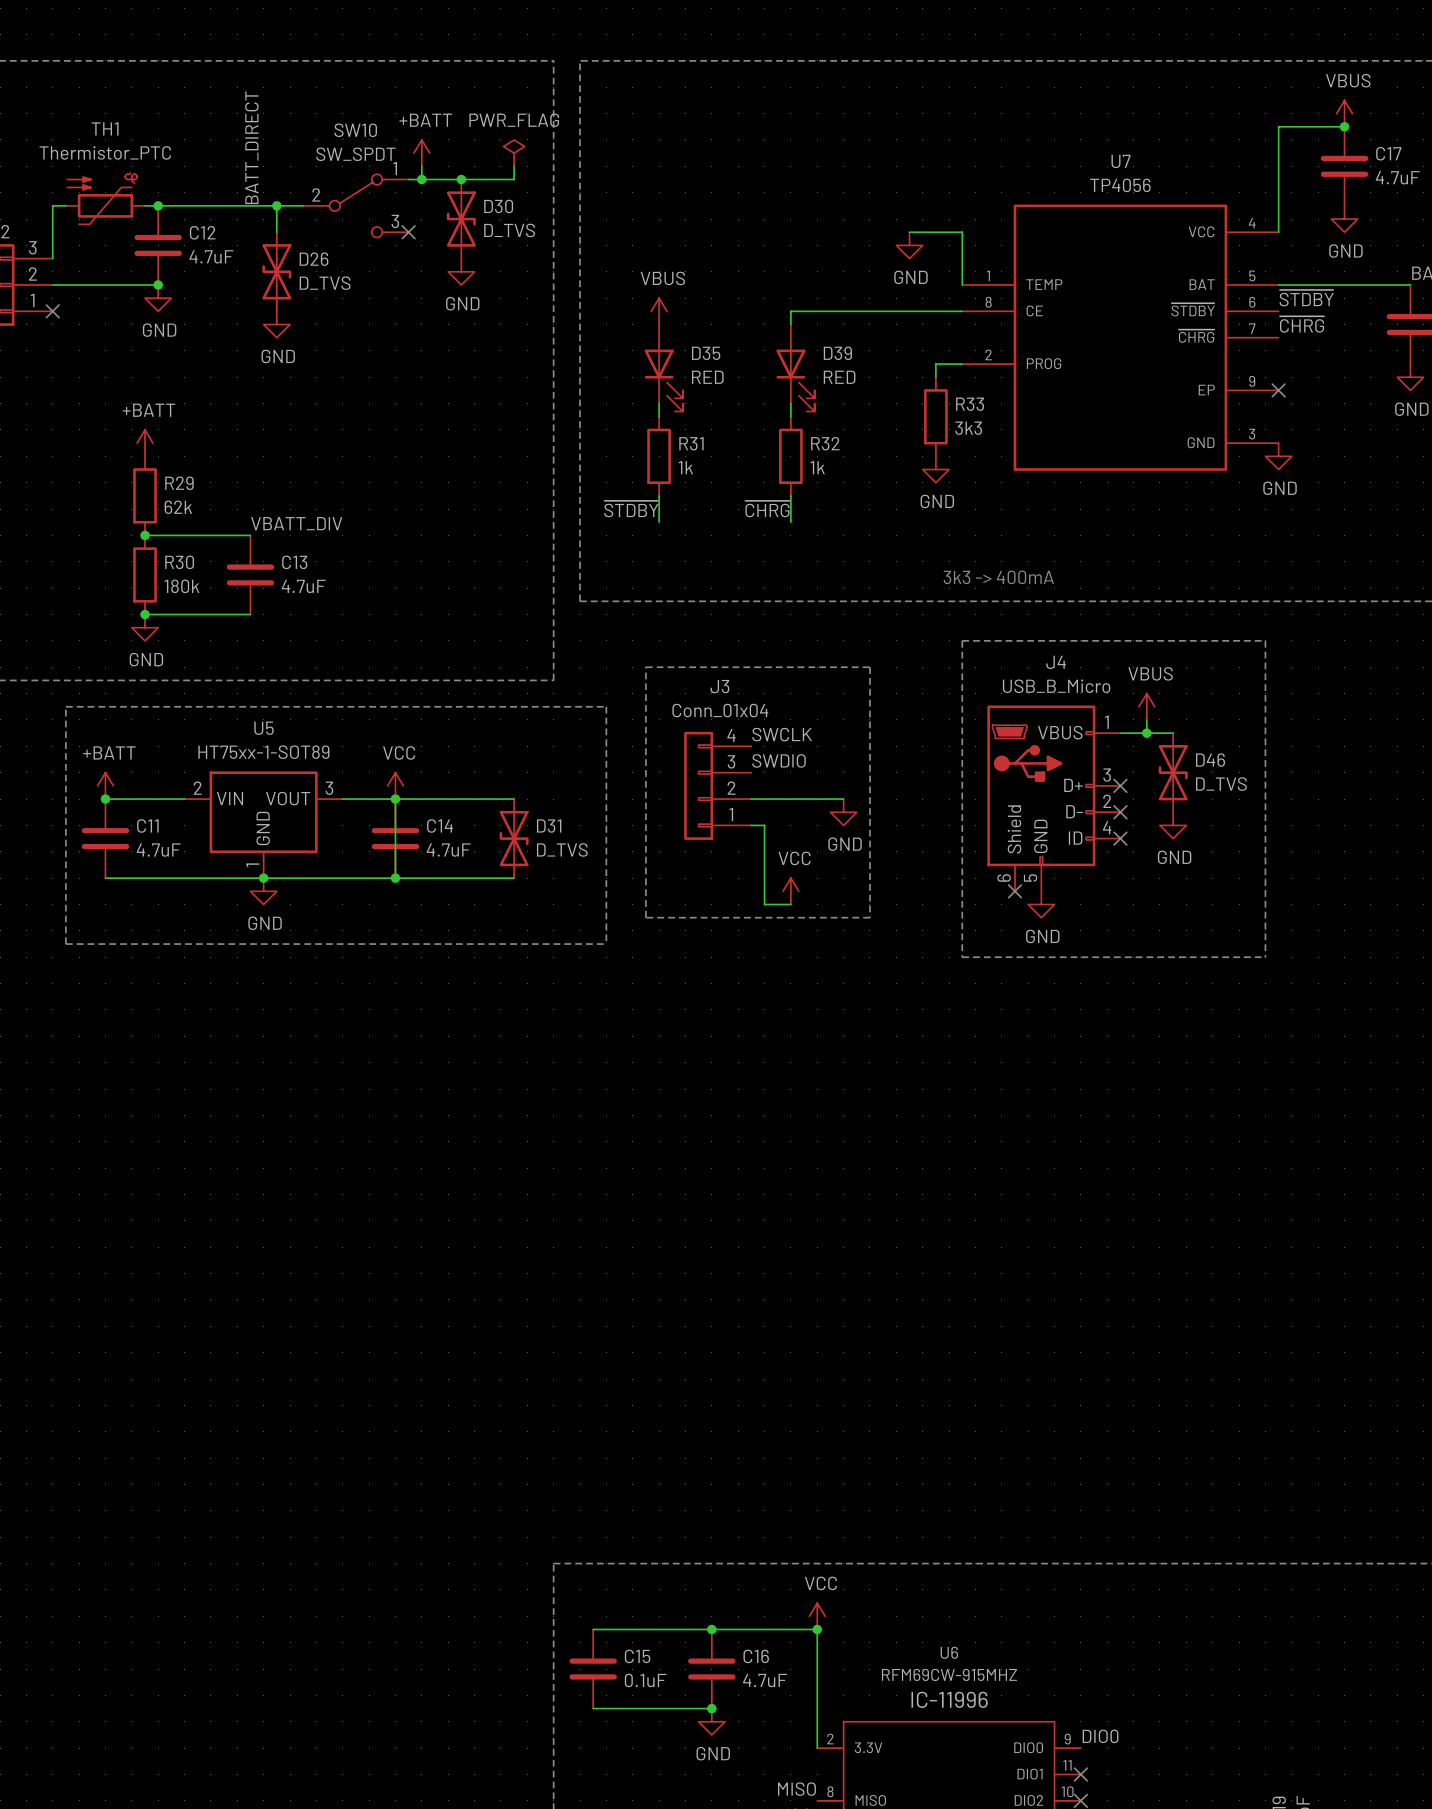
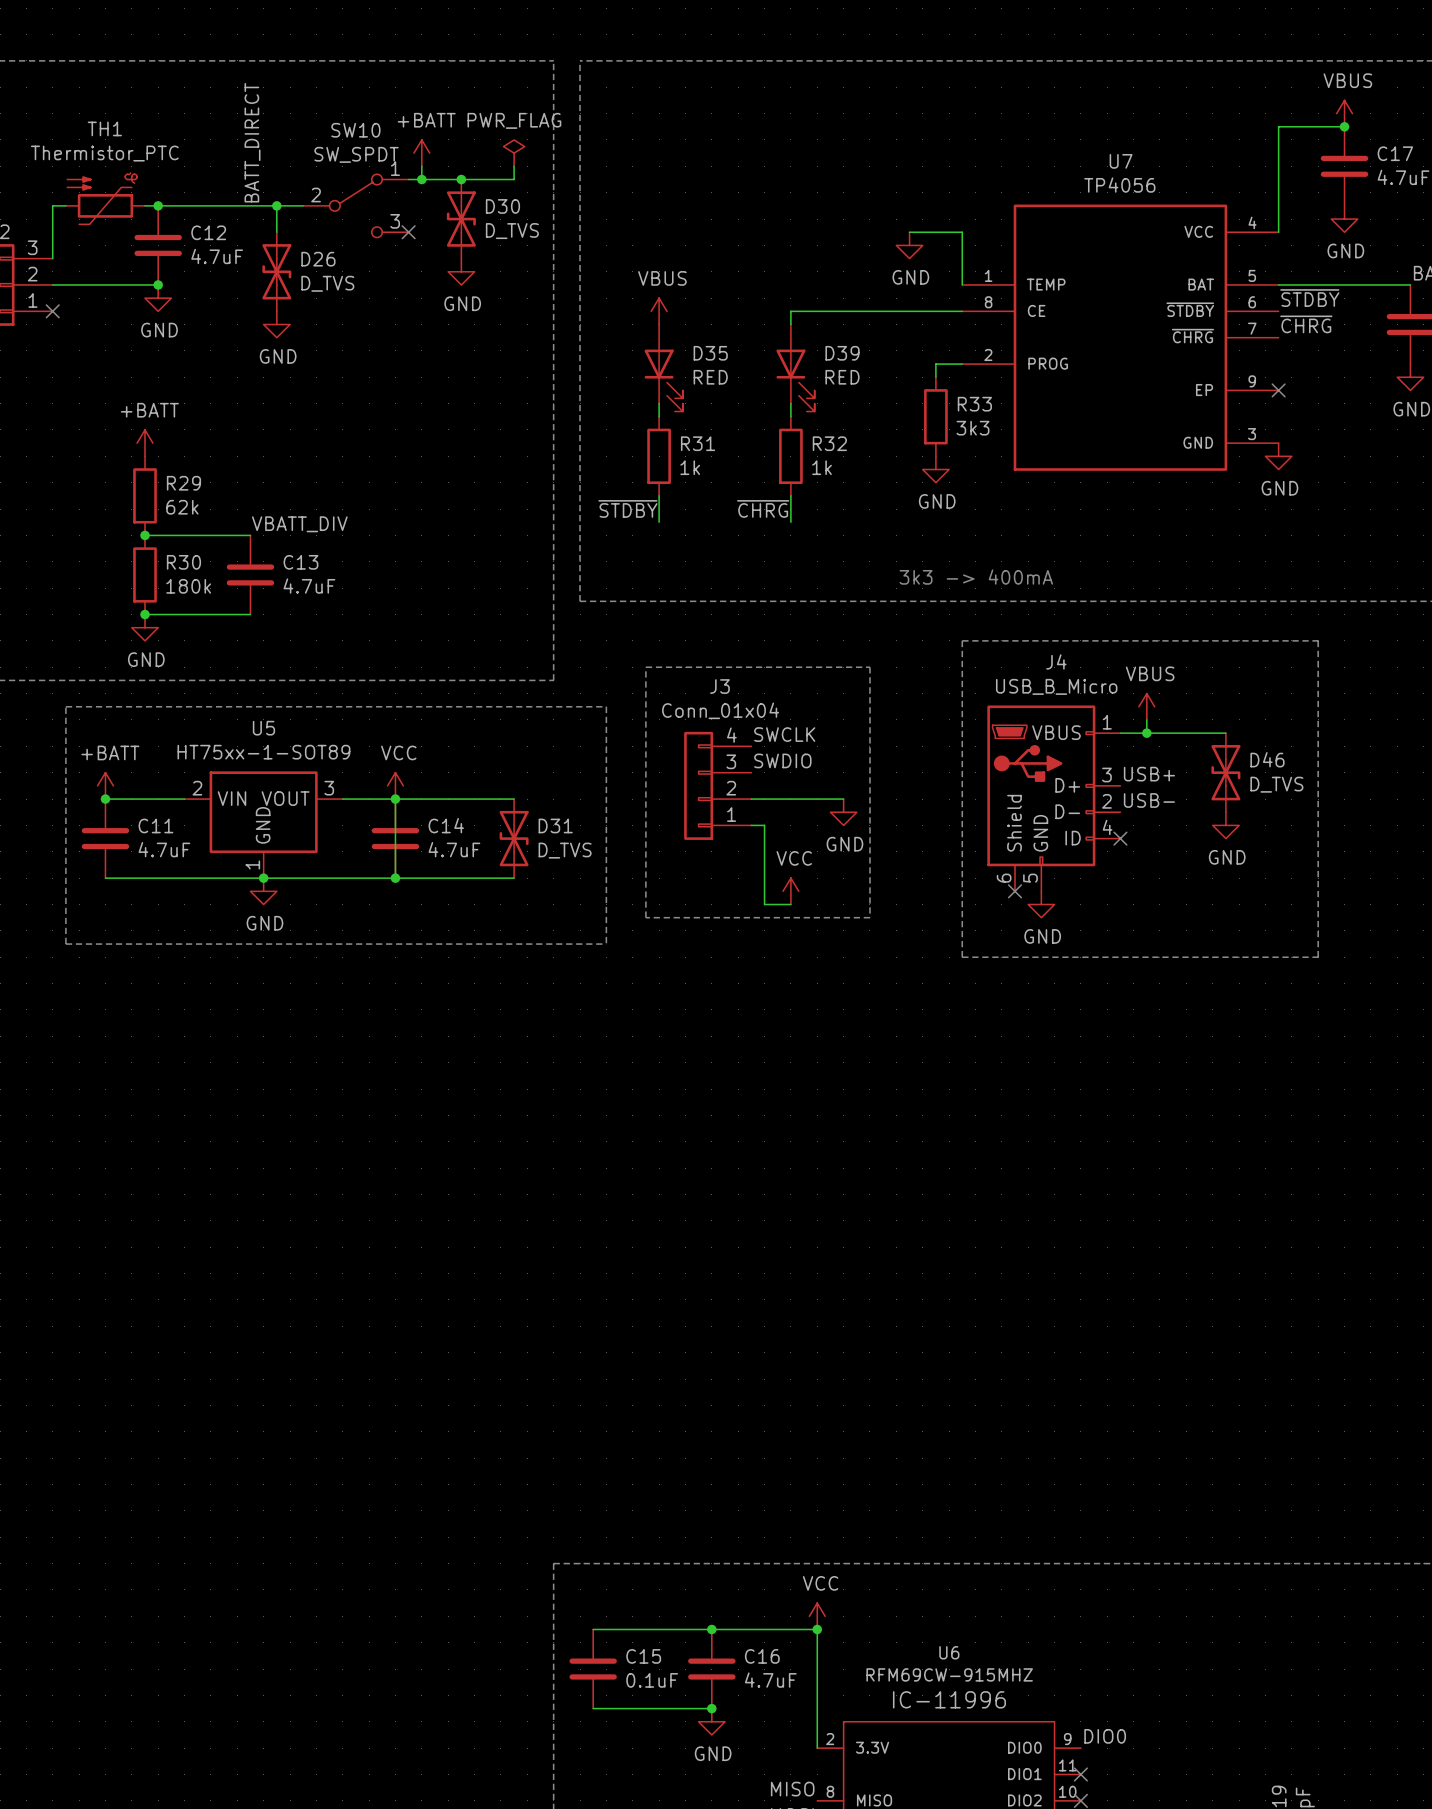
line: (1265, 640) (1265, 957) -> (1265, 640) (1318, 640) (1318, 957) (1265, 957)
wire: none -> (1173, 733) (1225, 733)
D46 position: (1173, 772) -> (1225, 772)
label: none -> USB+ (1149, 774)
no-connect mark: (1120, 785) -> none
label: none -> USB- (1149, 800)
no-connect mark: (1120, 812) -> none
power symbol position: GND (1173, 825) -> GND (1225, 825)

